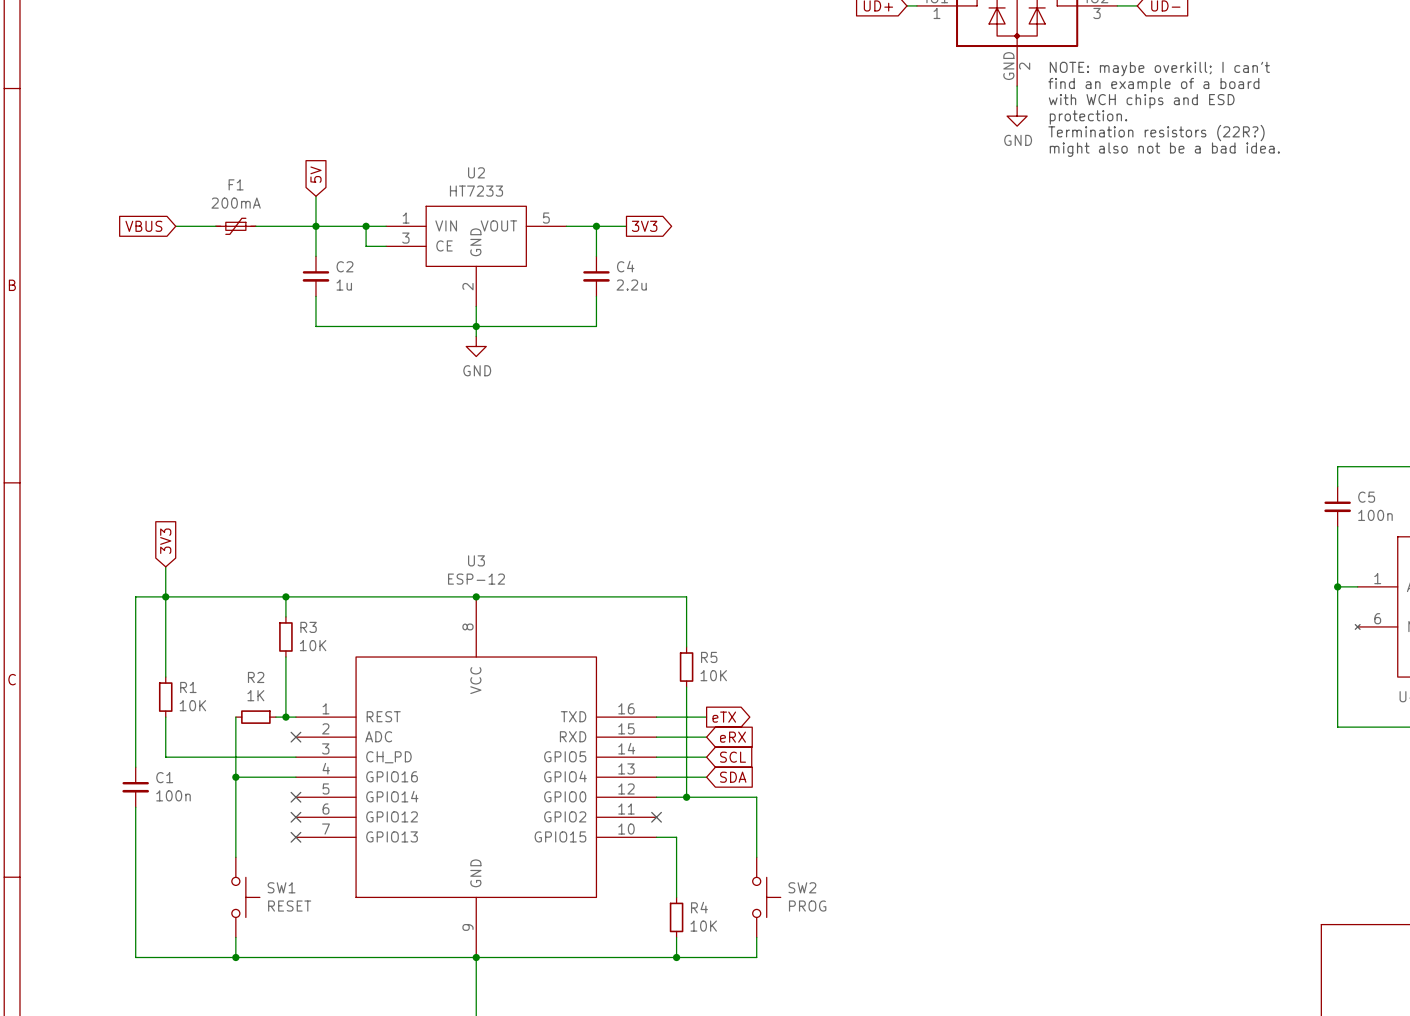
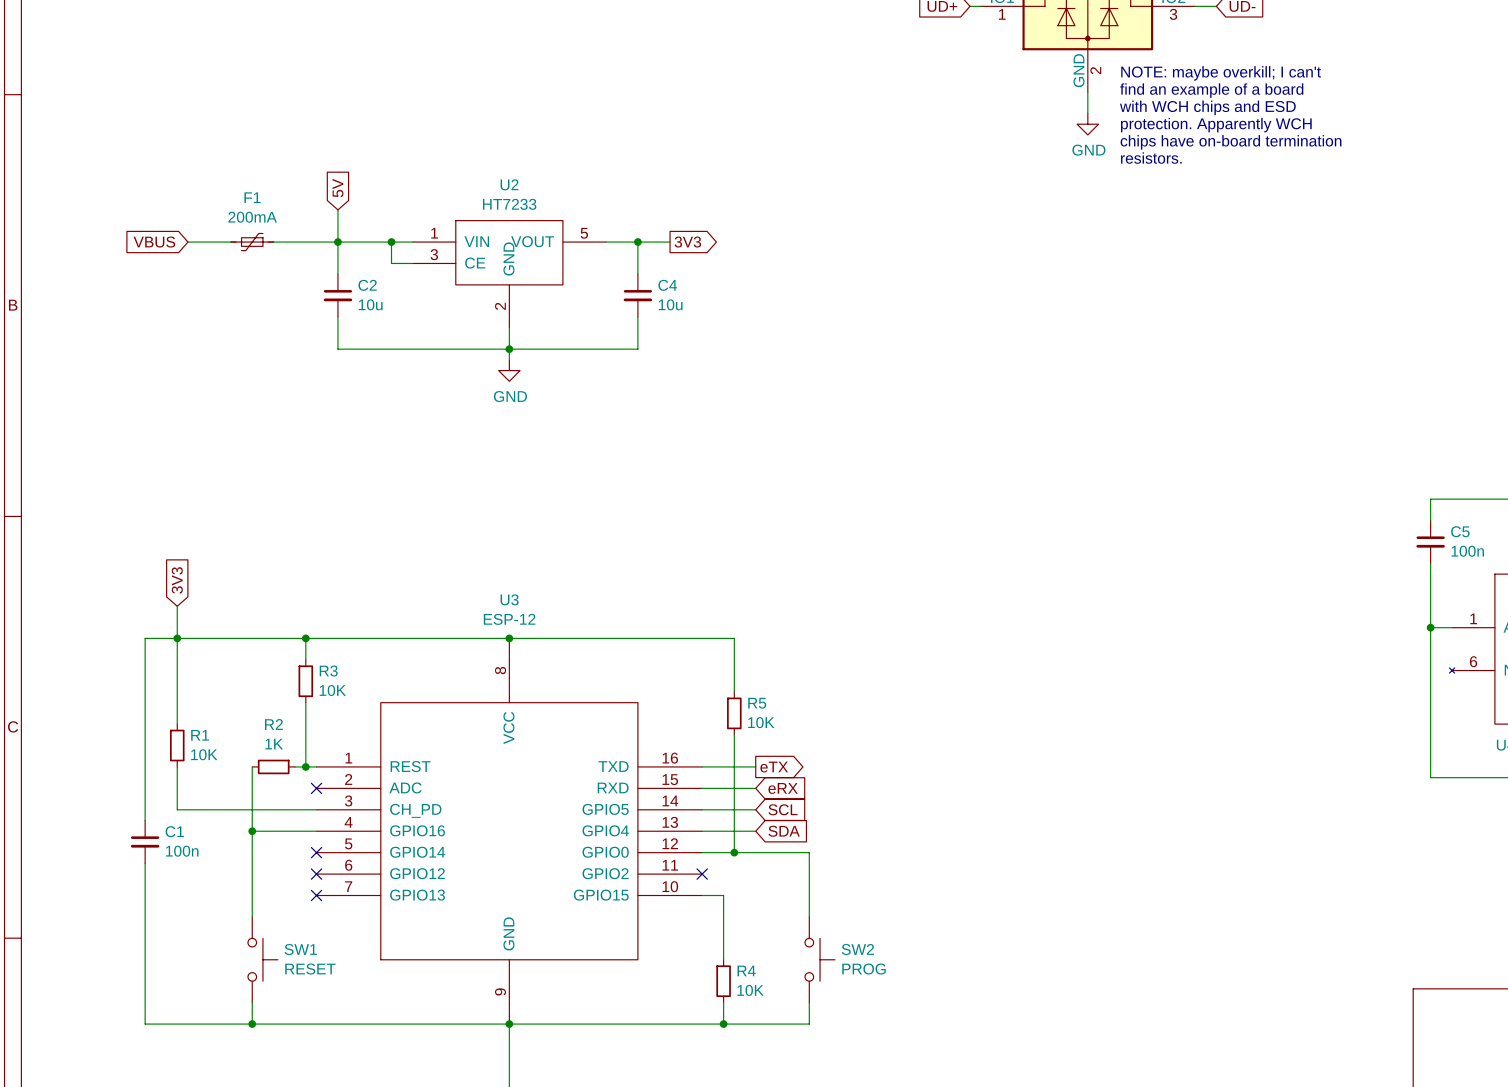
text: protection. (1088, 117) -> protection. Apparently WCH (1216, 125)
text: Termination resistors (22R?) (1156, 133) -> chips have on-board termination (1231, 142)
text: might also not be a bad idea. (1164, 149) -> resistors. (1151, 158)
C2 value: 1u (344, 285) -> 10u (370, 304)
C4 value: 2.2u (631, 285) -> 10u (670, 304)

